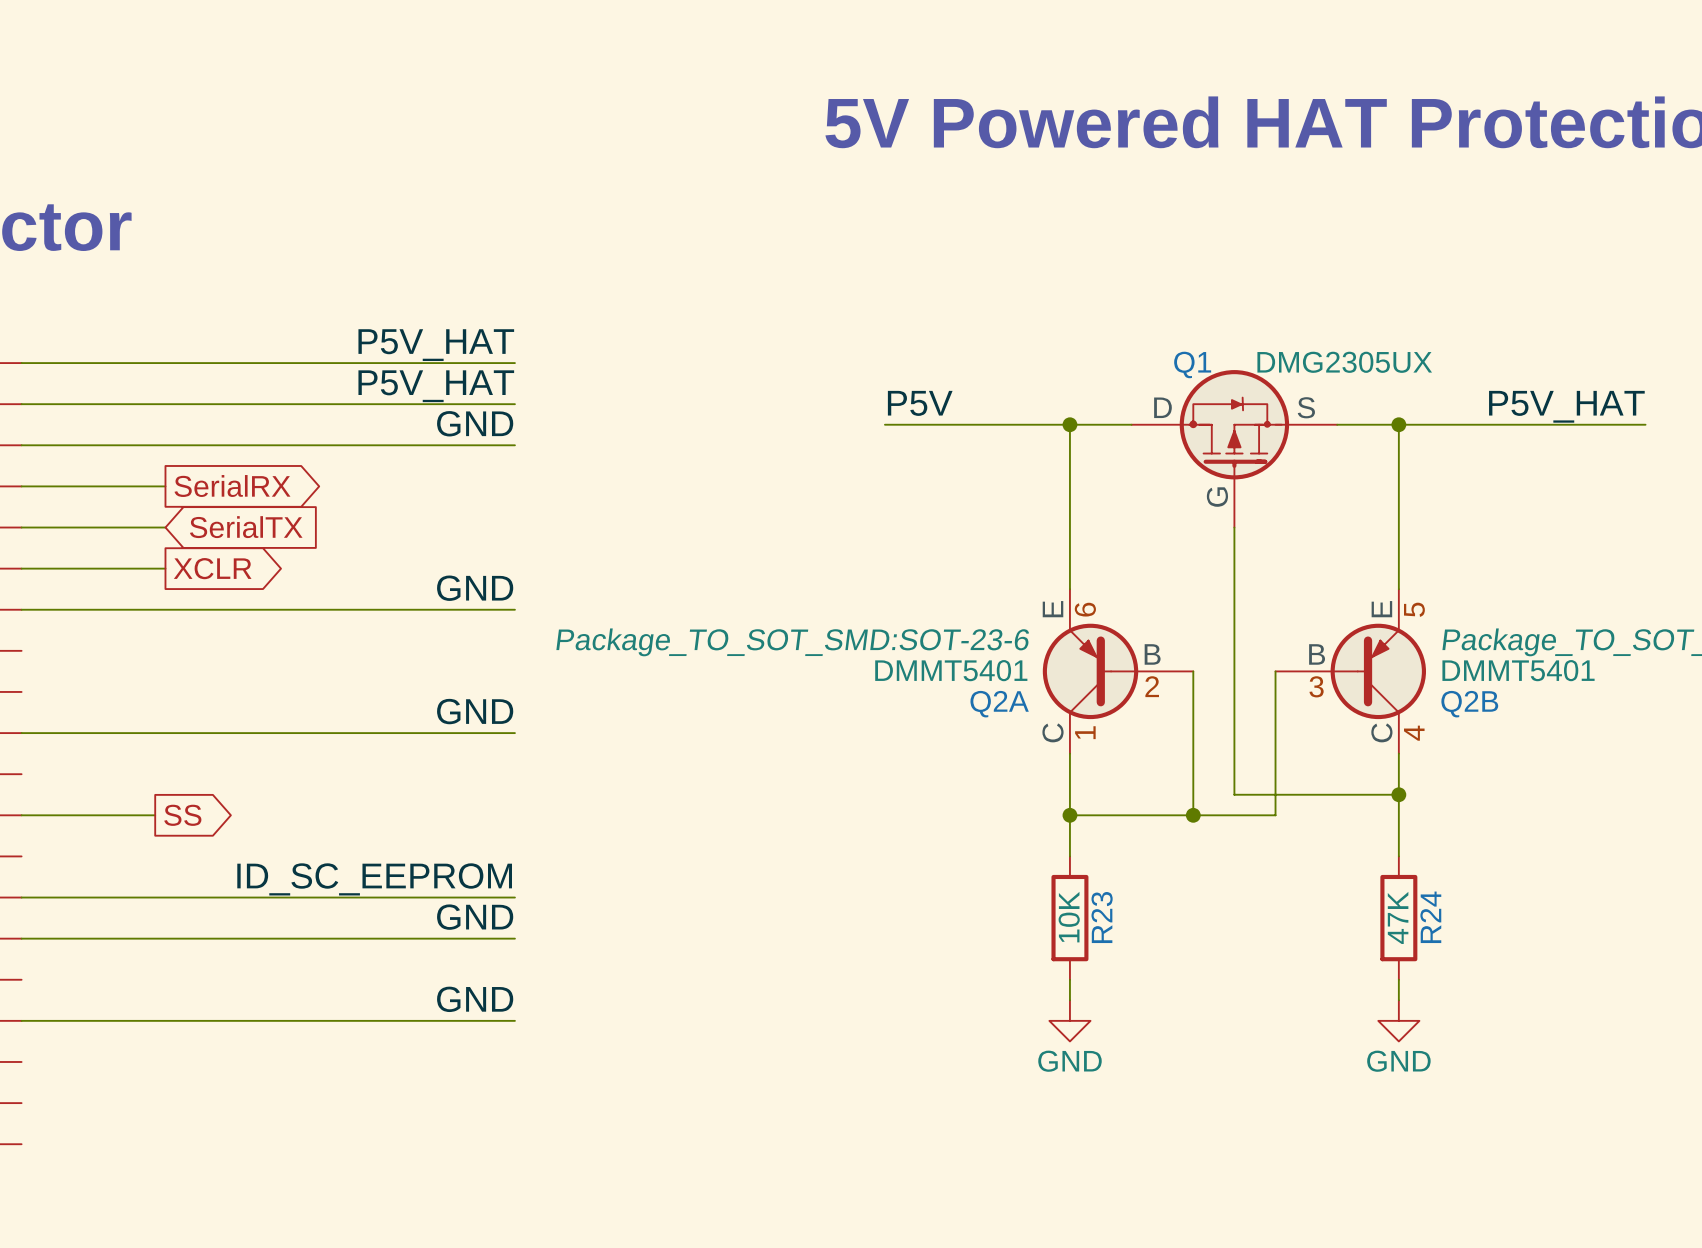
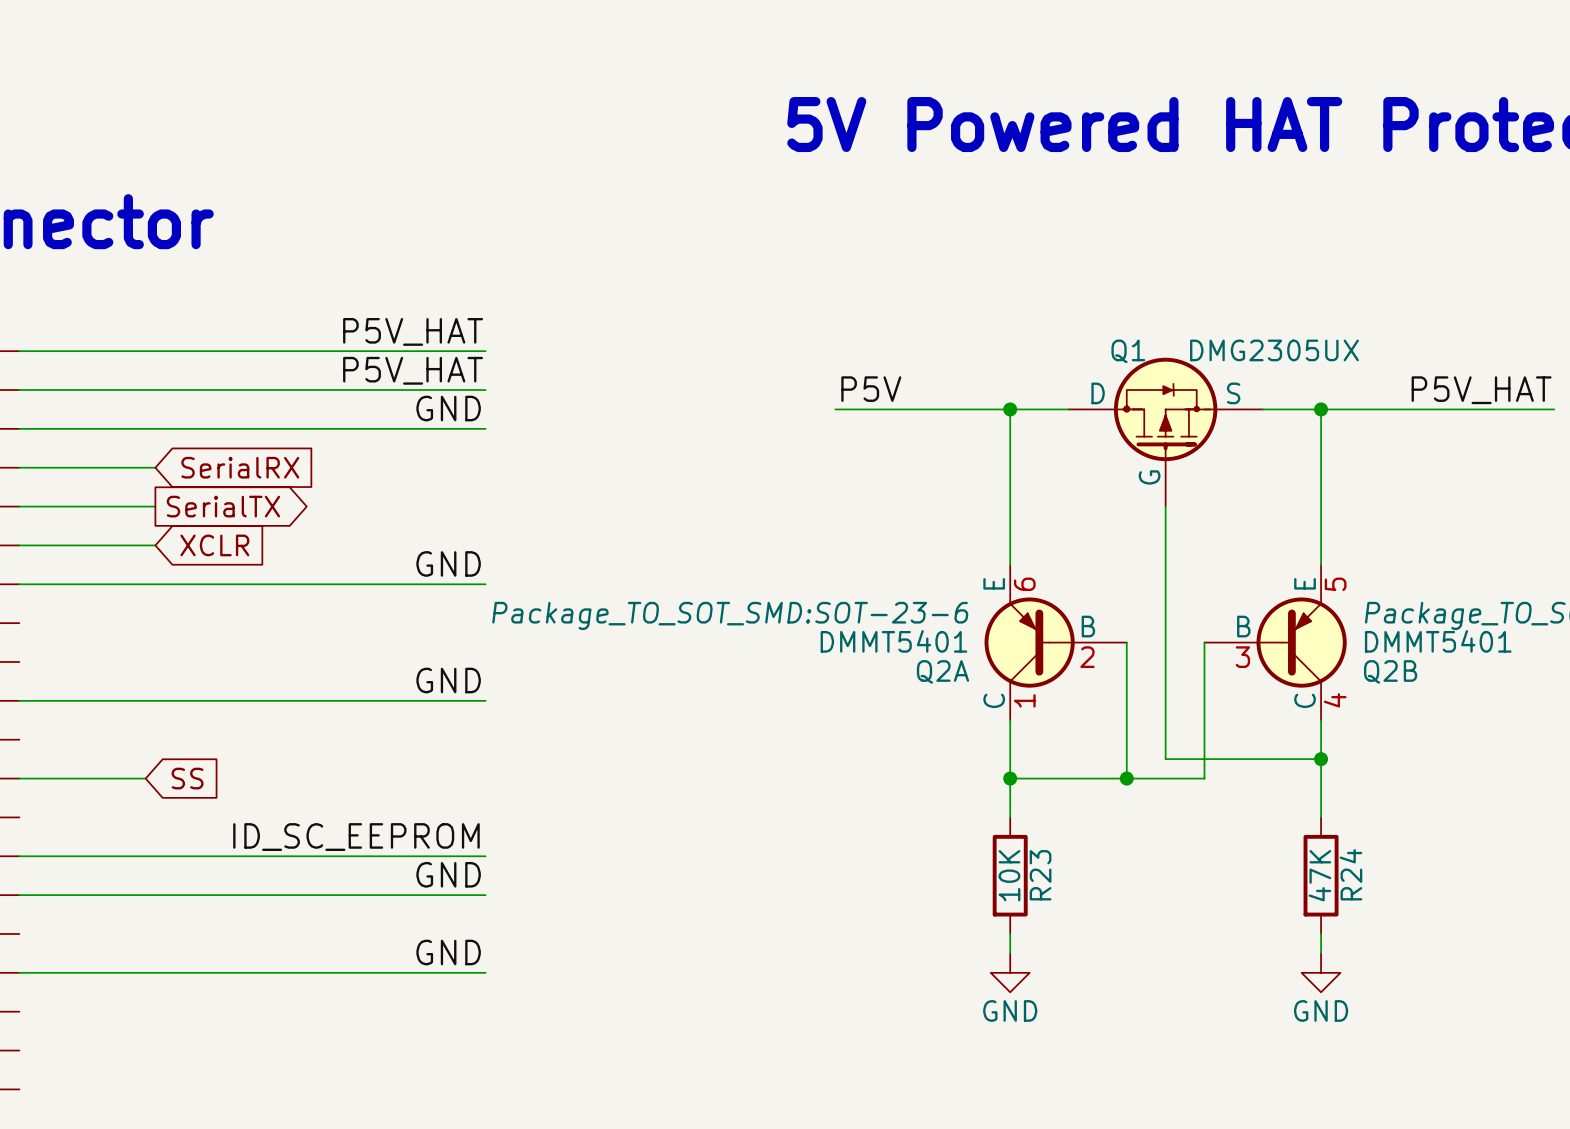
global label shape: output (232, 486) -> input (240, 467)
global label shape: input (246, 527) -> output (223, 506)
global label shape: output (212, 568) -> input (214, 545)
global label shape: output (182, 815) -> input (187, 778)

